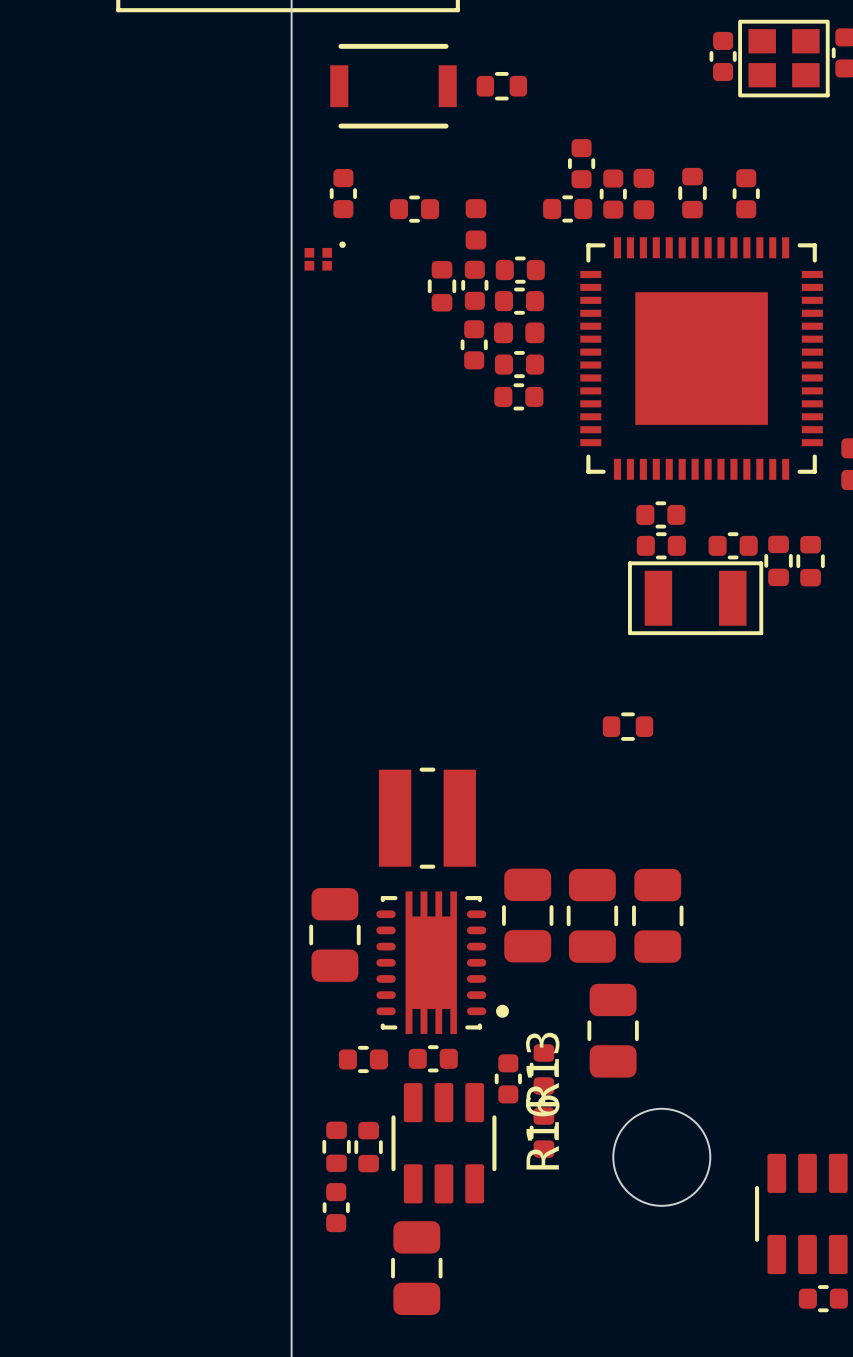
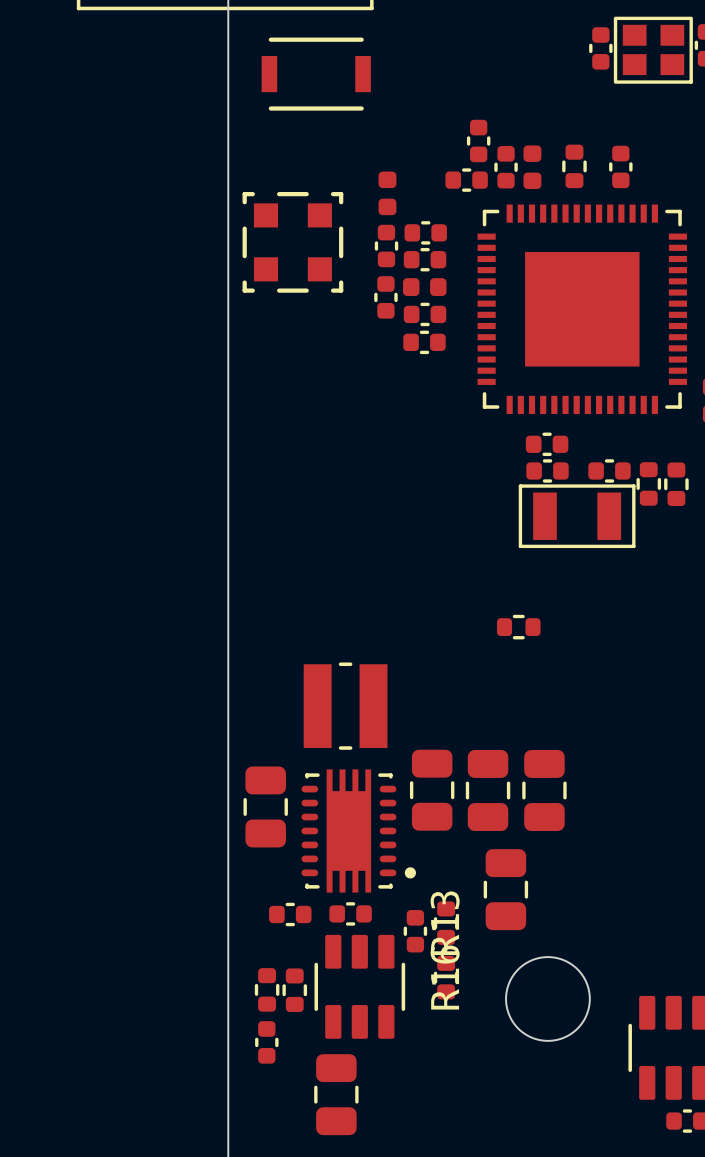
part: (501, 86) -> none
part: (343, 193) -> none
part: (414, 209) -> none
part: (325, 256) -> none
part: none -> (292, 242)
part: (442, 286) -> none

